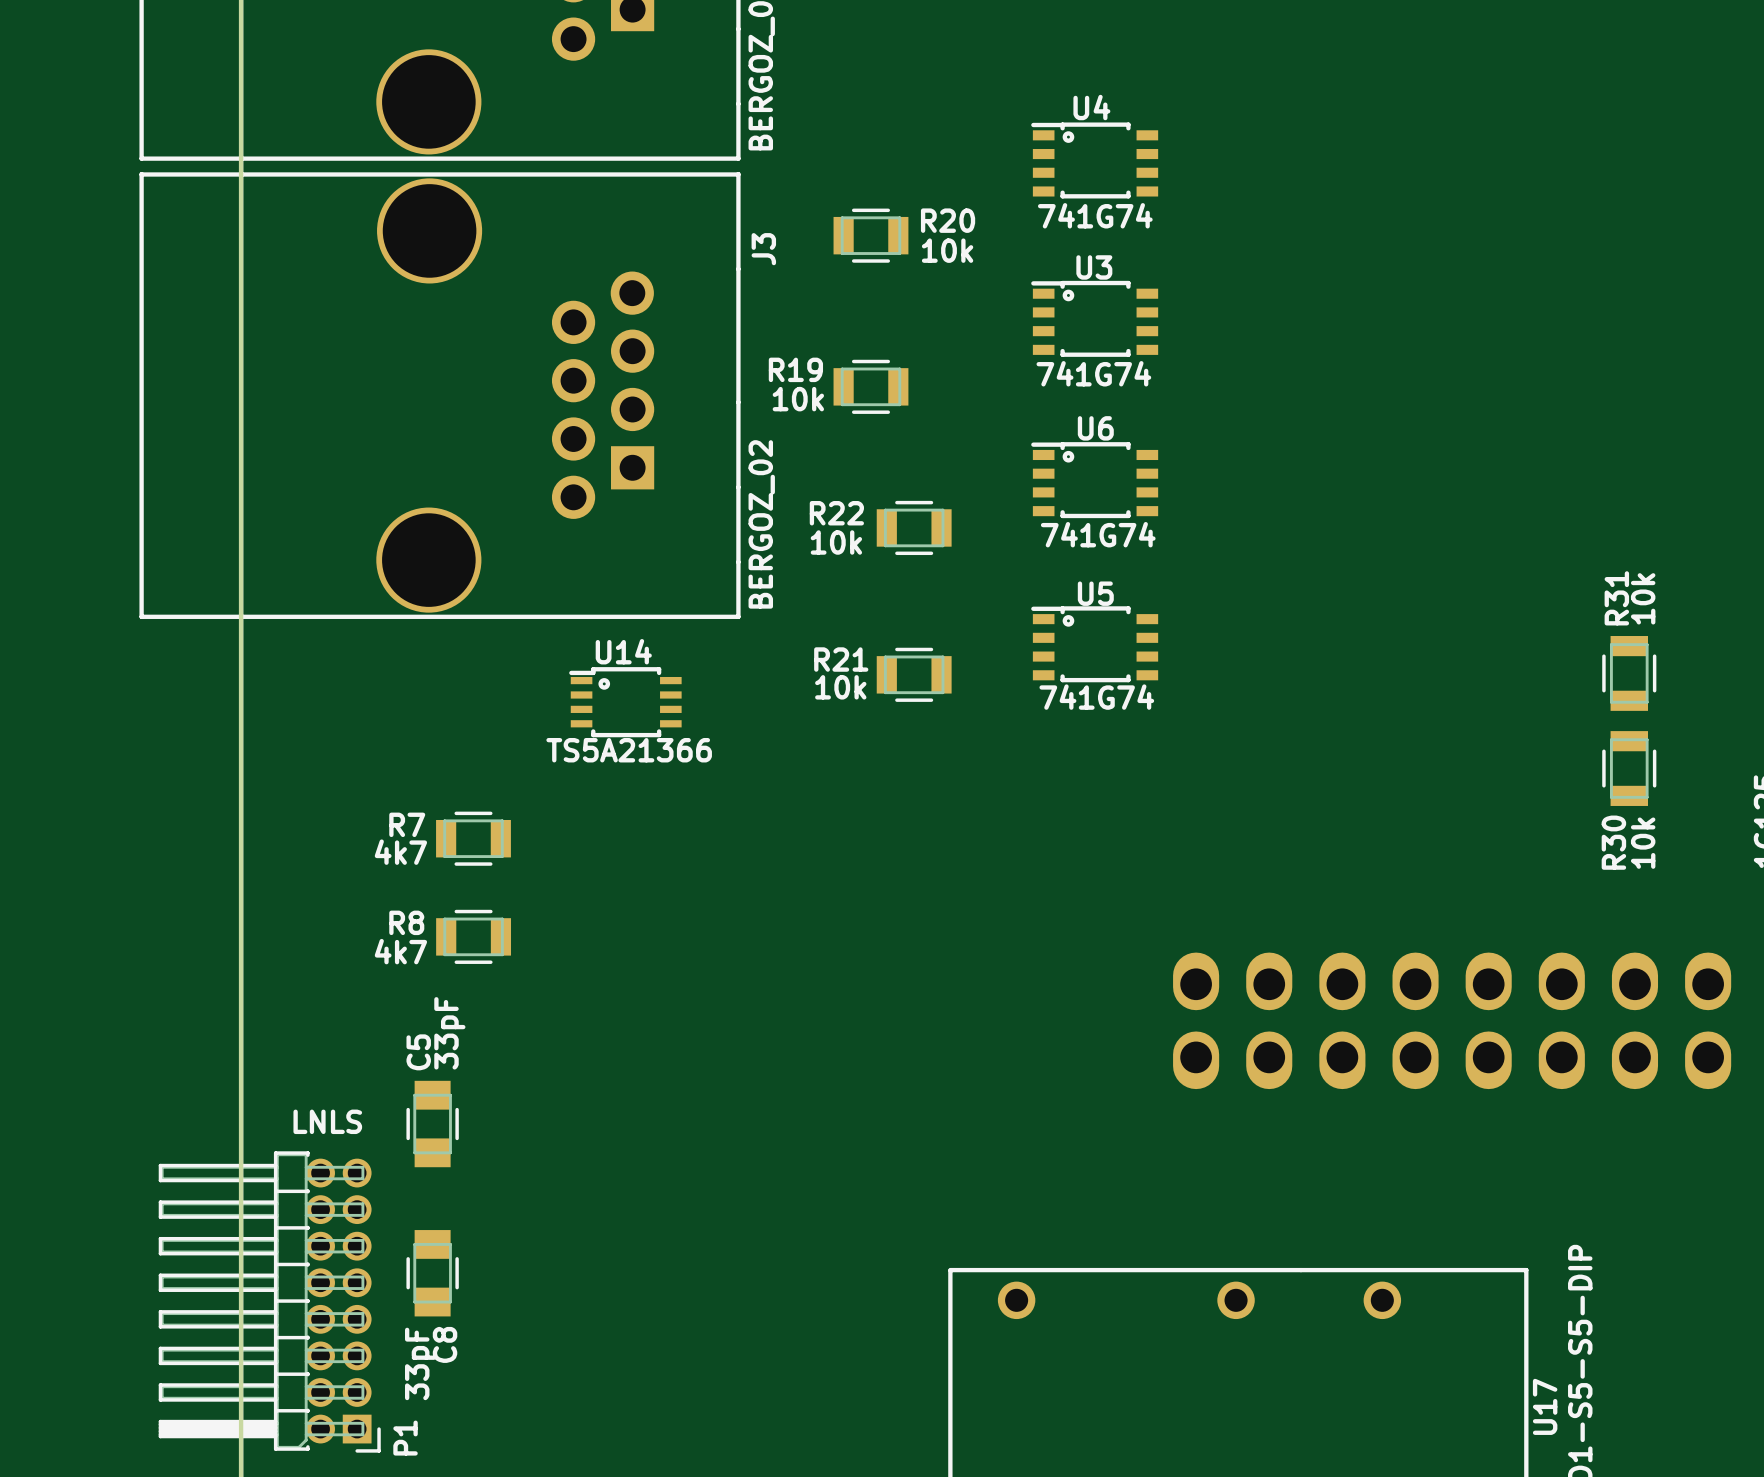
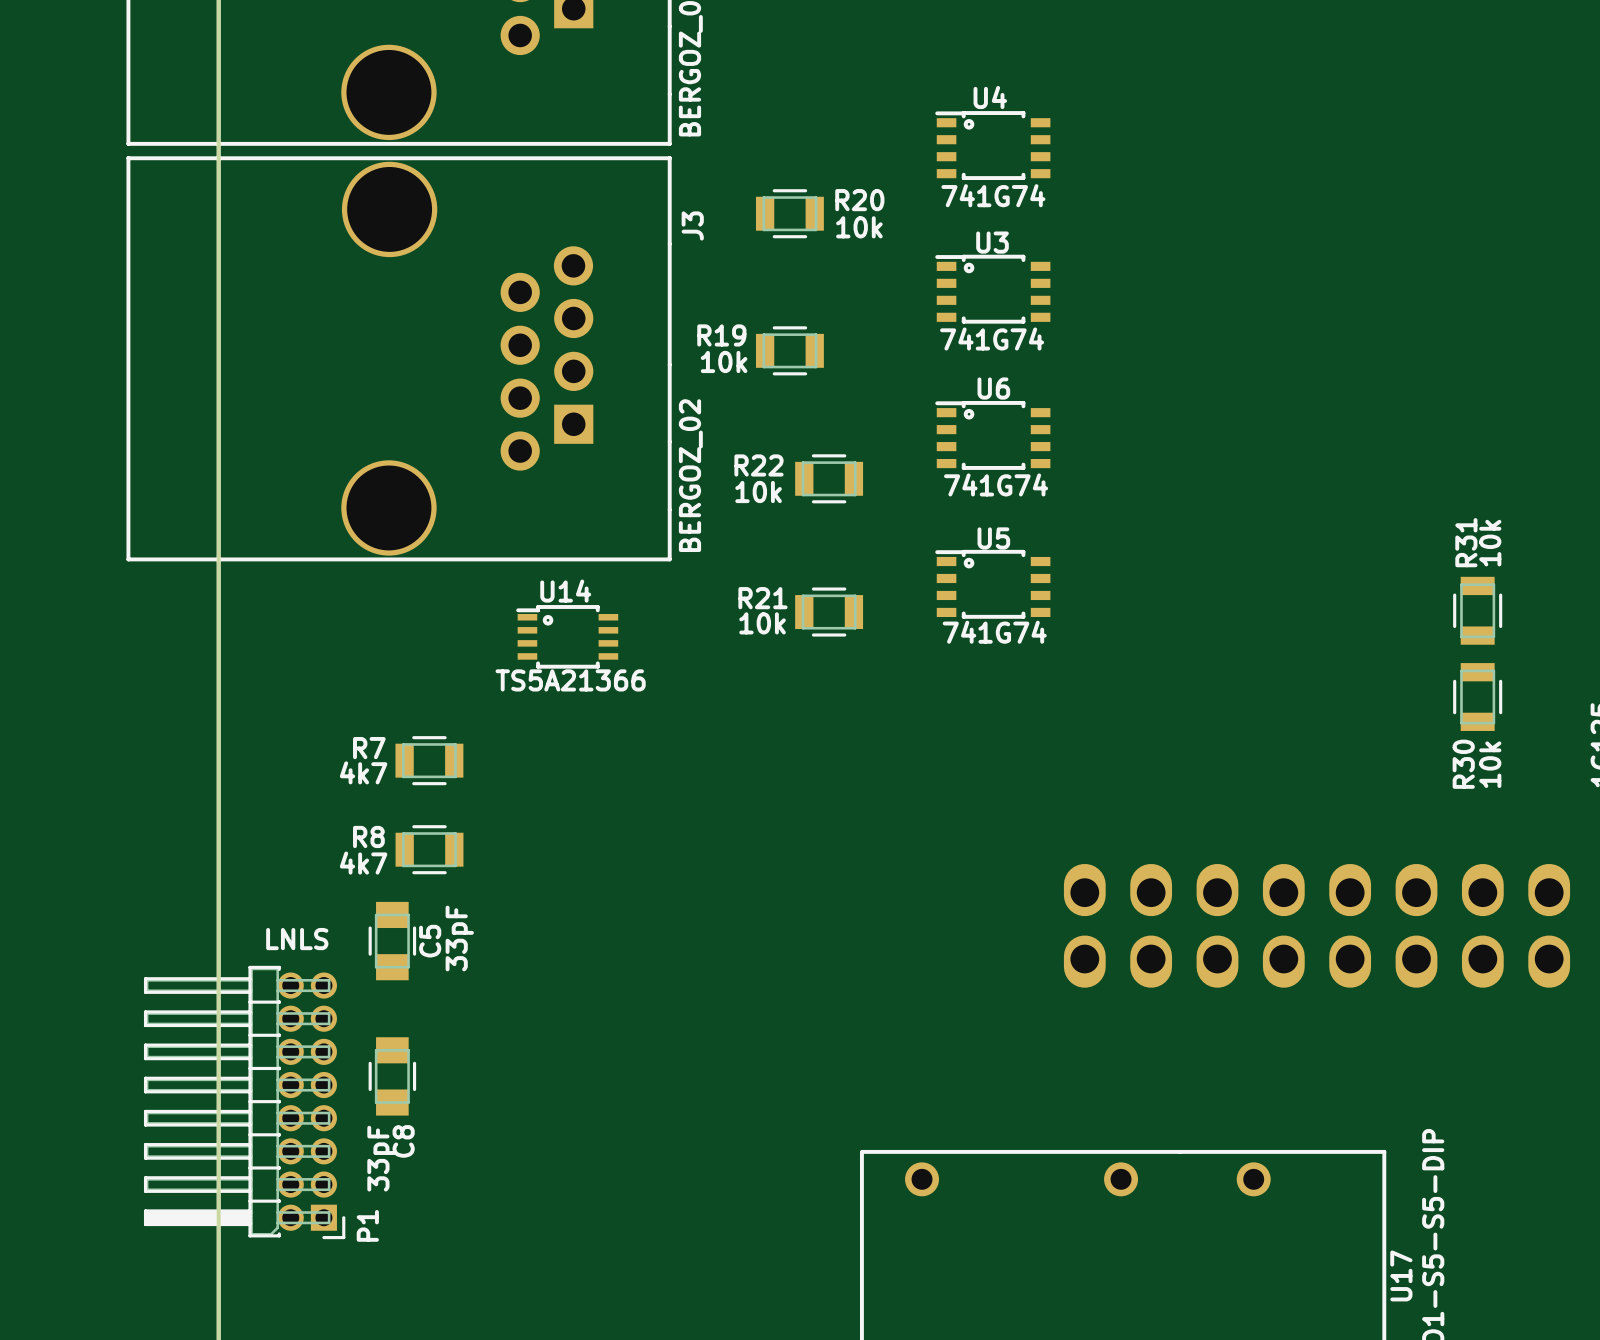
C5 value position: 33pF (449, 1033) -> 33pF (459, 938)
C5 name position: C5 (418, 1052) -> C5 (430, 941)
C5 position: (432, 1124) -> (392, 941)
C8 position: (432, 1273) -> (392, 1076)
P1 position: (269, 1301) -> (244, 1102)

